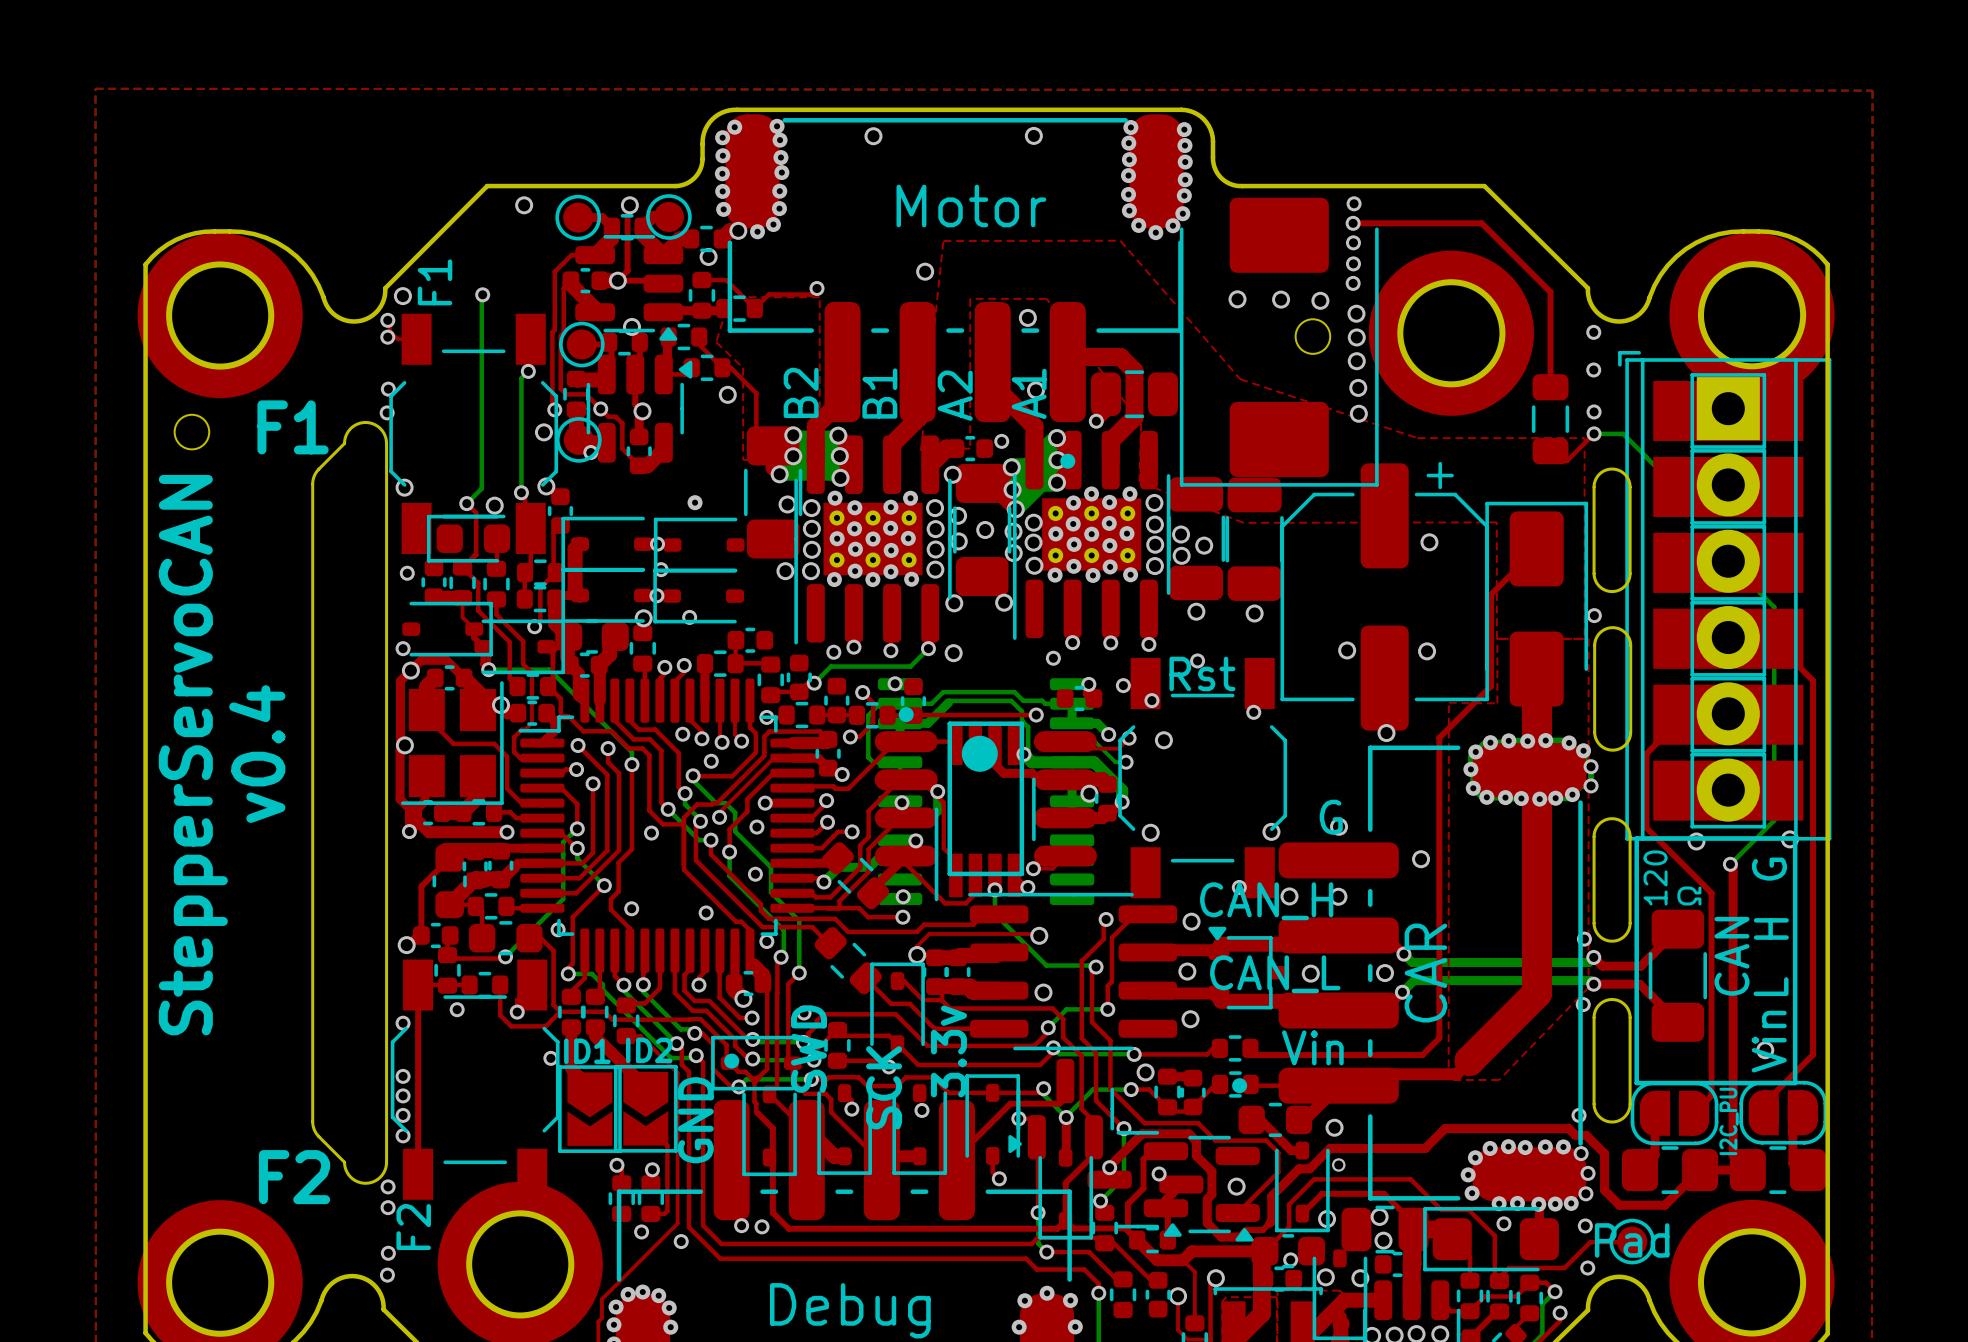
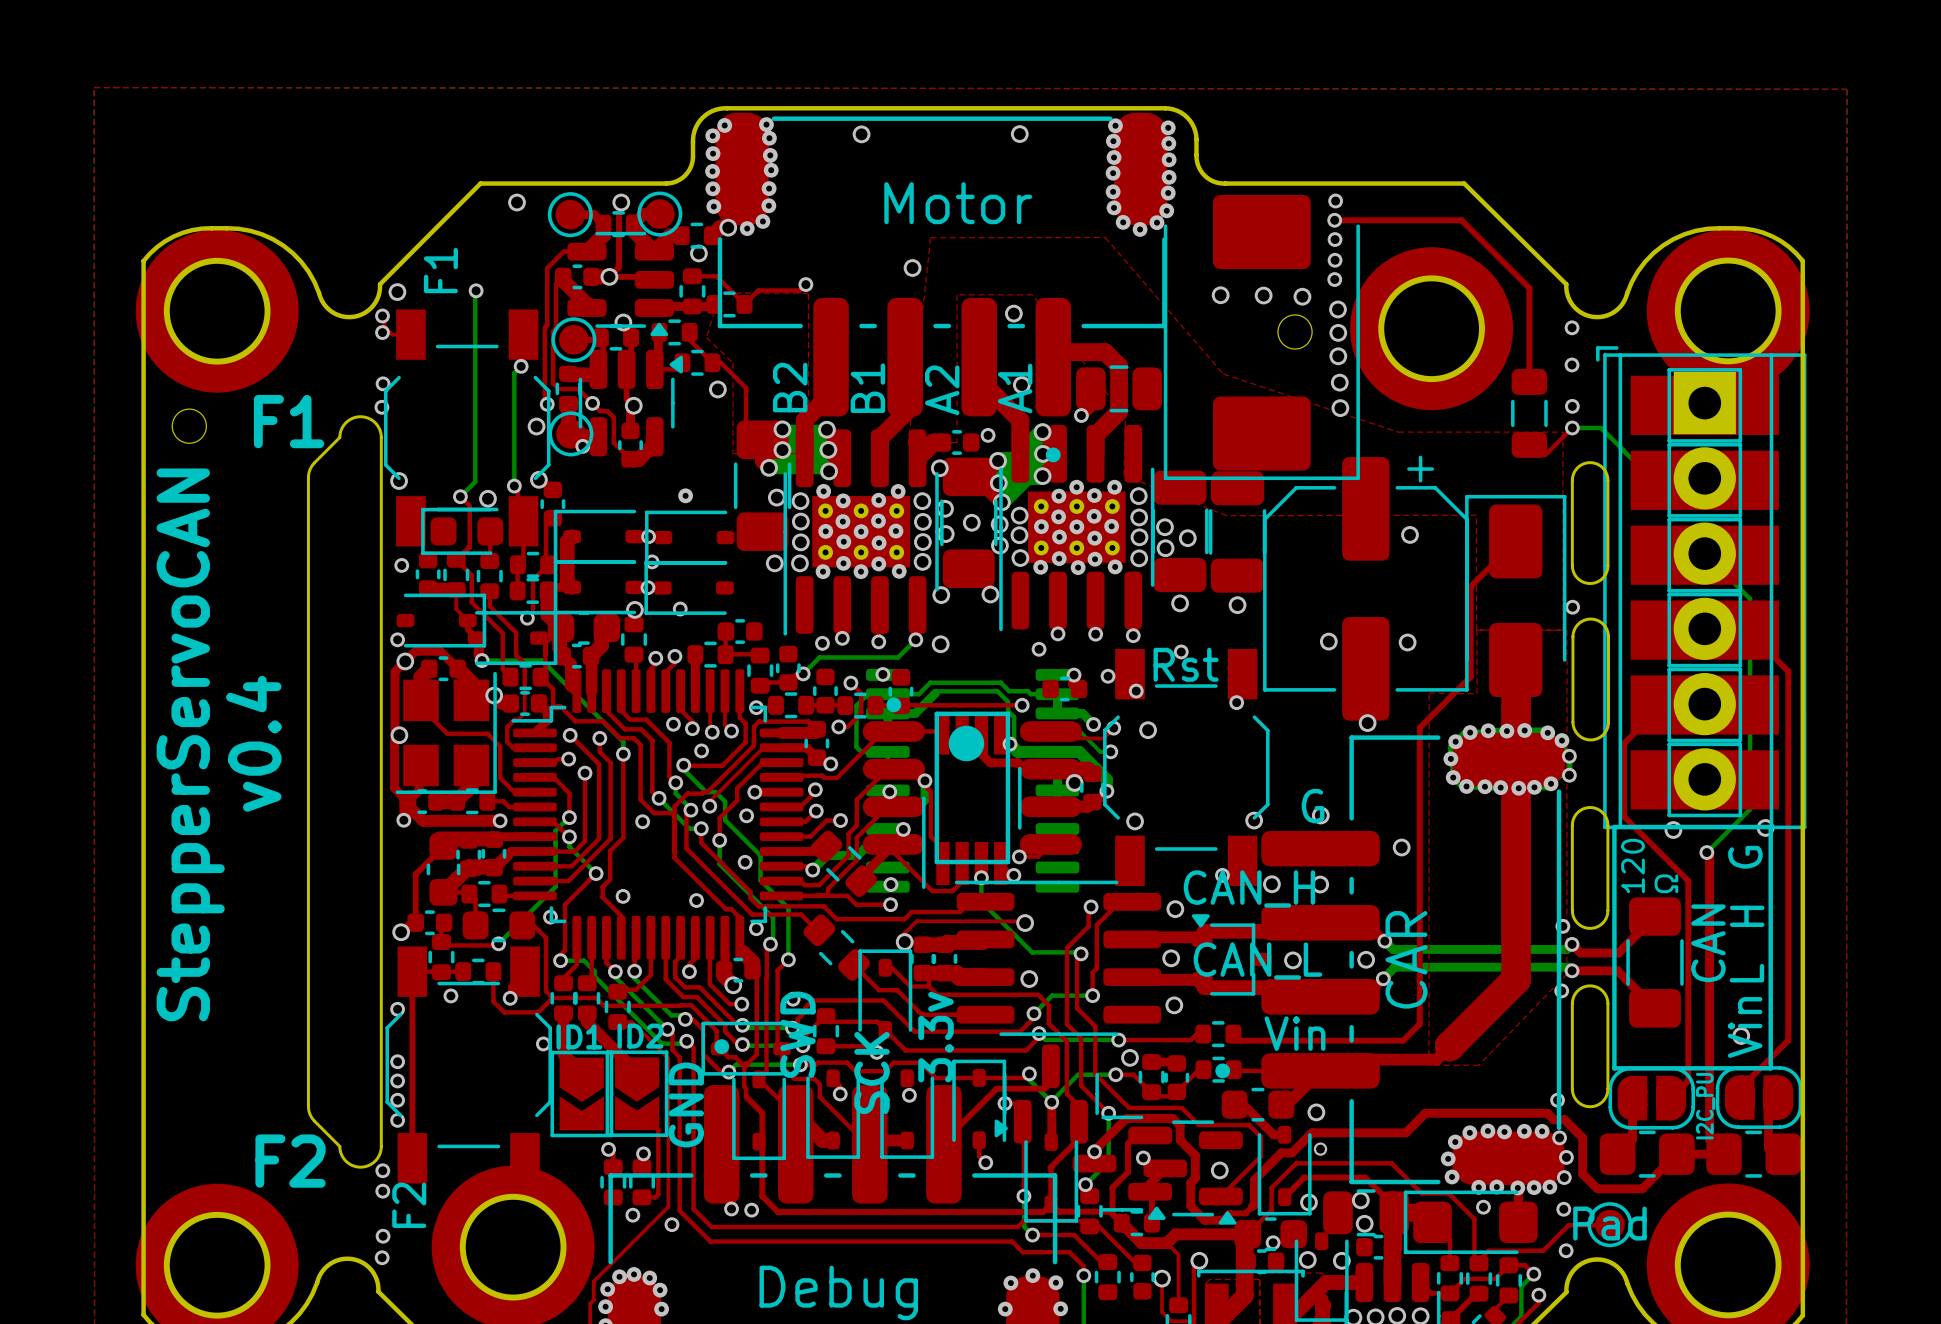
F1 name: none -> F1 (440, 270)
text: F1 (435, 282) -> none
F2 name: none -> F2 (409, 1205)
text: F2 (413, 1227) -> none

